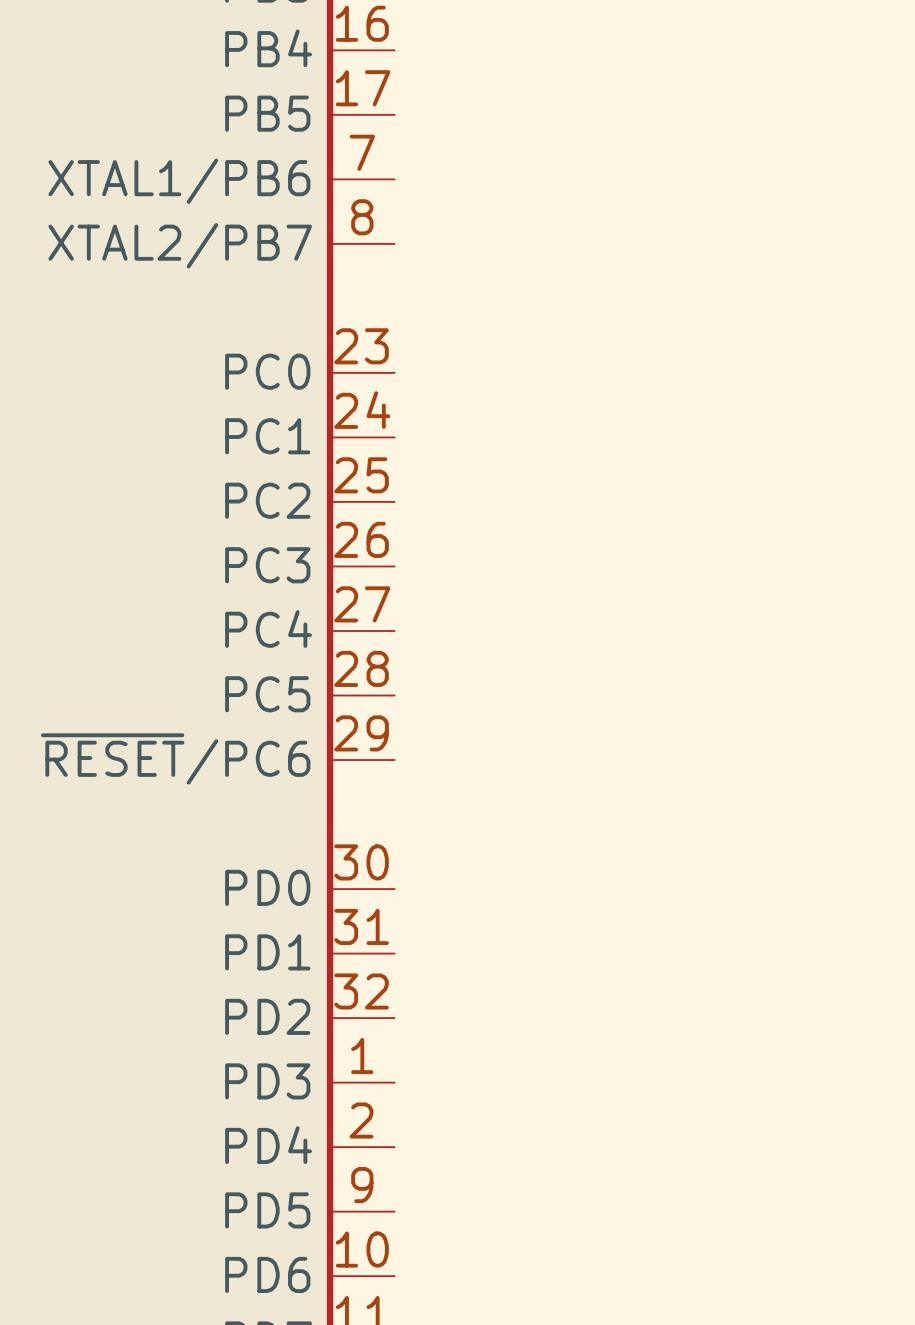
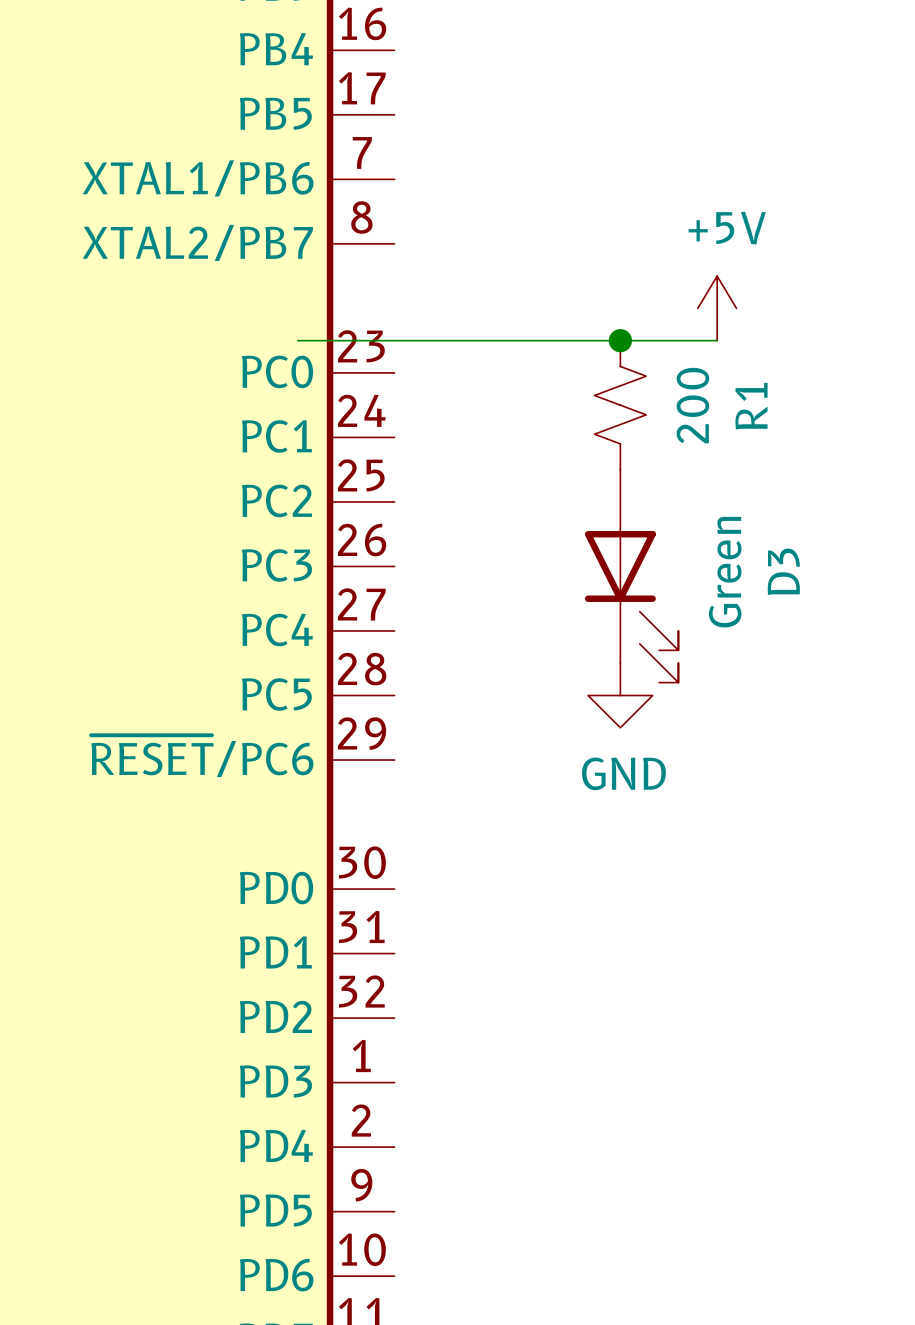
power symbol: none -> +5V (717, 308)
wire: none -> (297, 340) (717, 340)
junction: none -> (620, 340)
R1: none -> 200 (620, 405)
D3: none -> Green (631, 576)
power symbol: none -> GND (620, 695)

